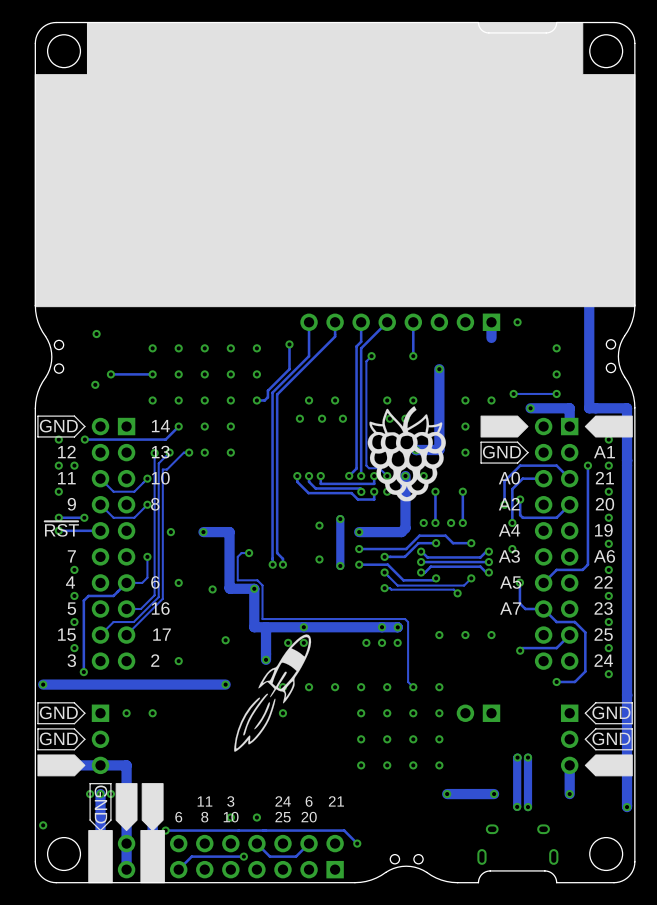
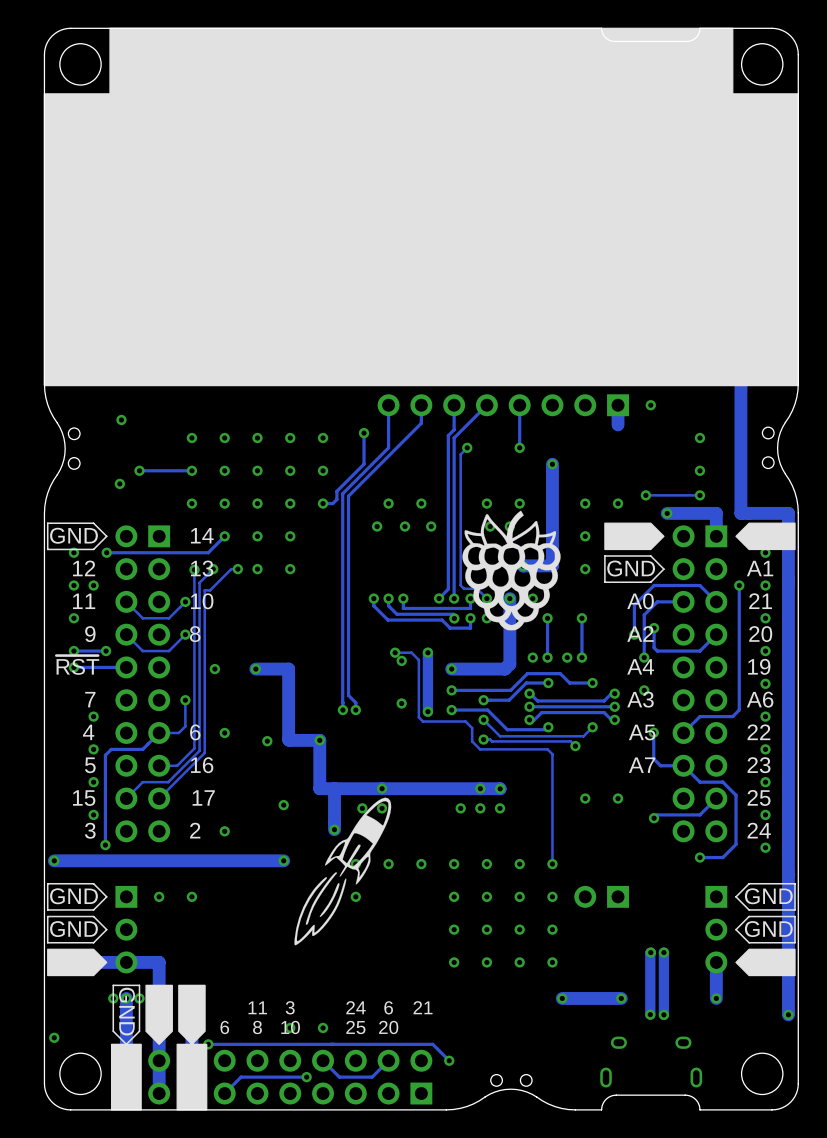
track: none -> (395, 652) (411, 652) (418, 660) (418, 717) (423, 721) (465, 721) (472, 728) (472, 741) (480, 749) (547, 749) (552, 754) (552, 864)
via: none -> (395, 652)
track: (249, 553) (241, 553) (237, 556) (237, 580) (257, 580) (262, 585) (262, 619) (405, 619) (408, 622) (408, 681) (413, 687) -> none
via: (249, 553) -> none
via: (439, 635) -> none

